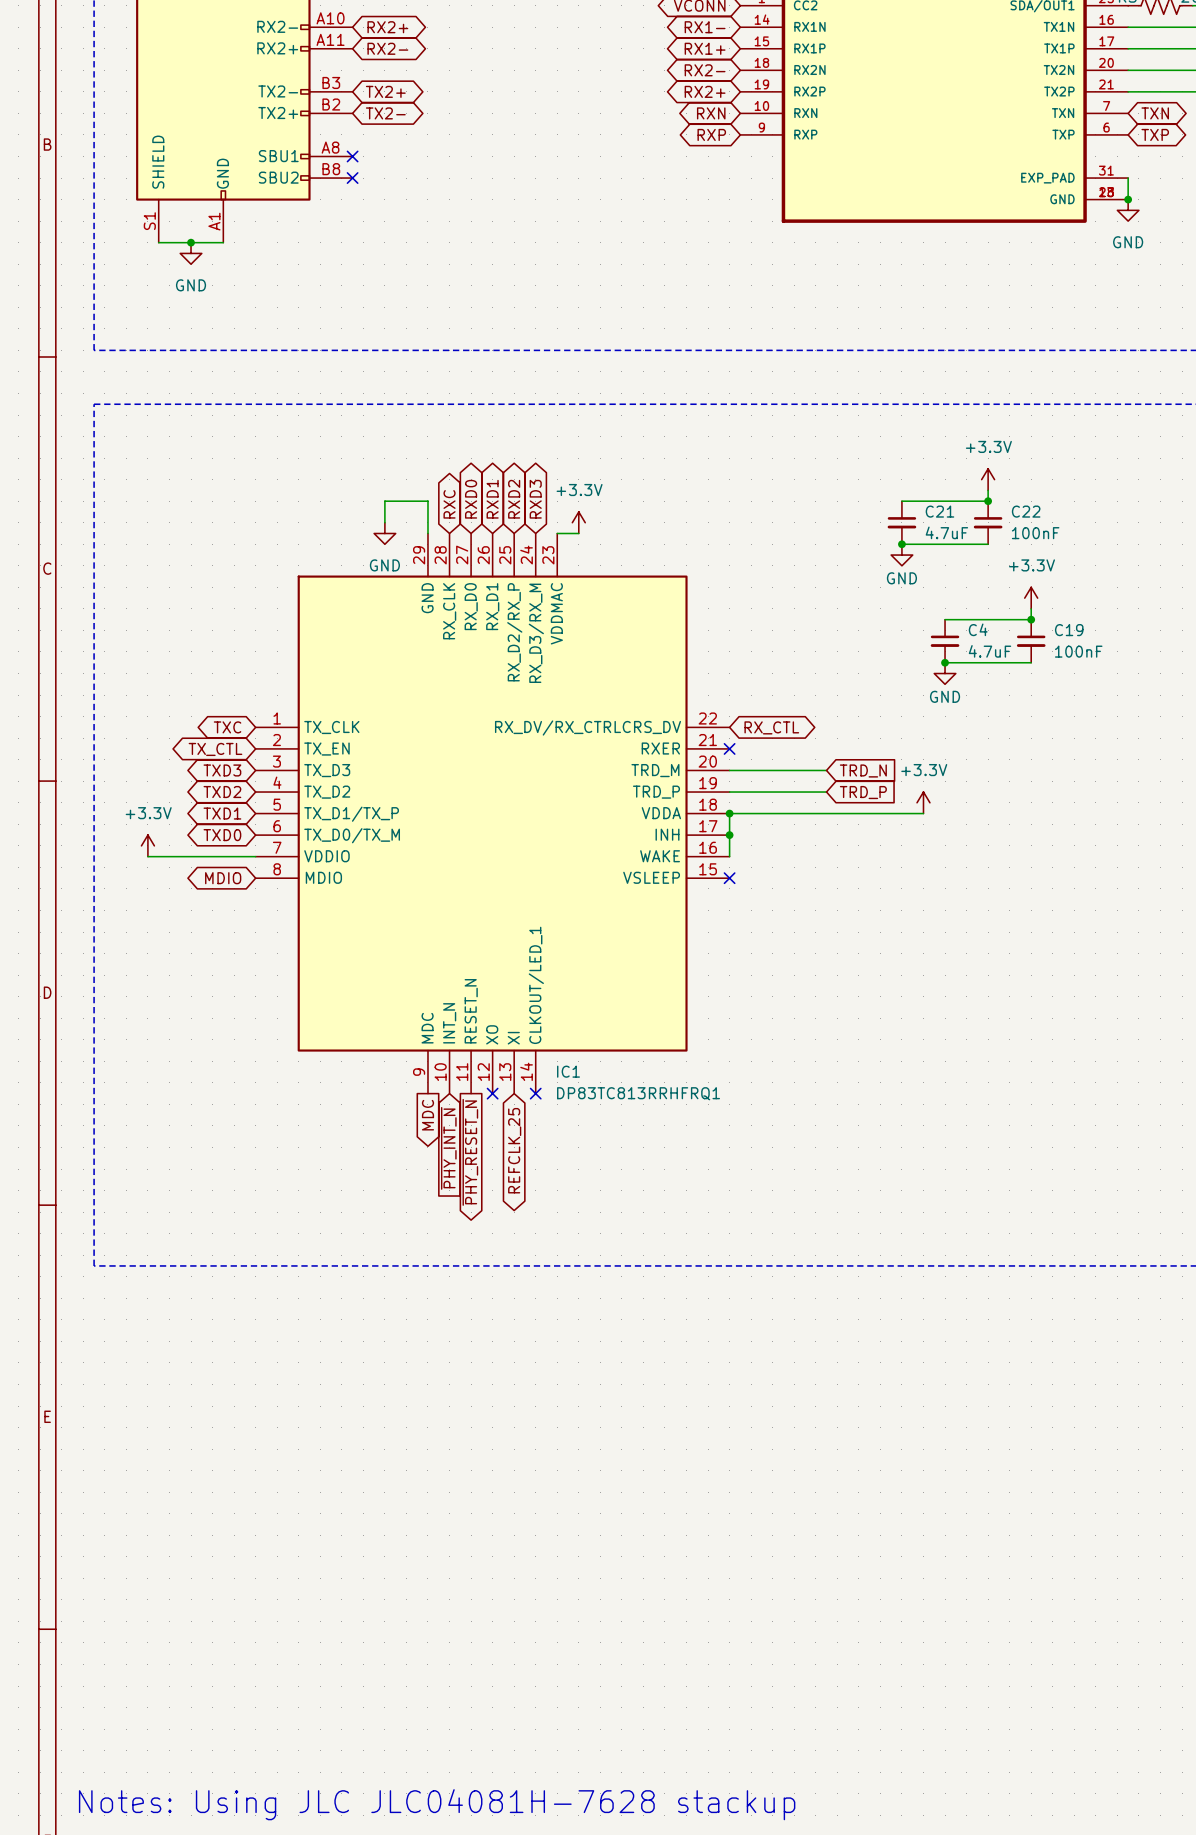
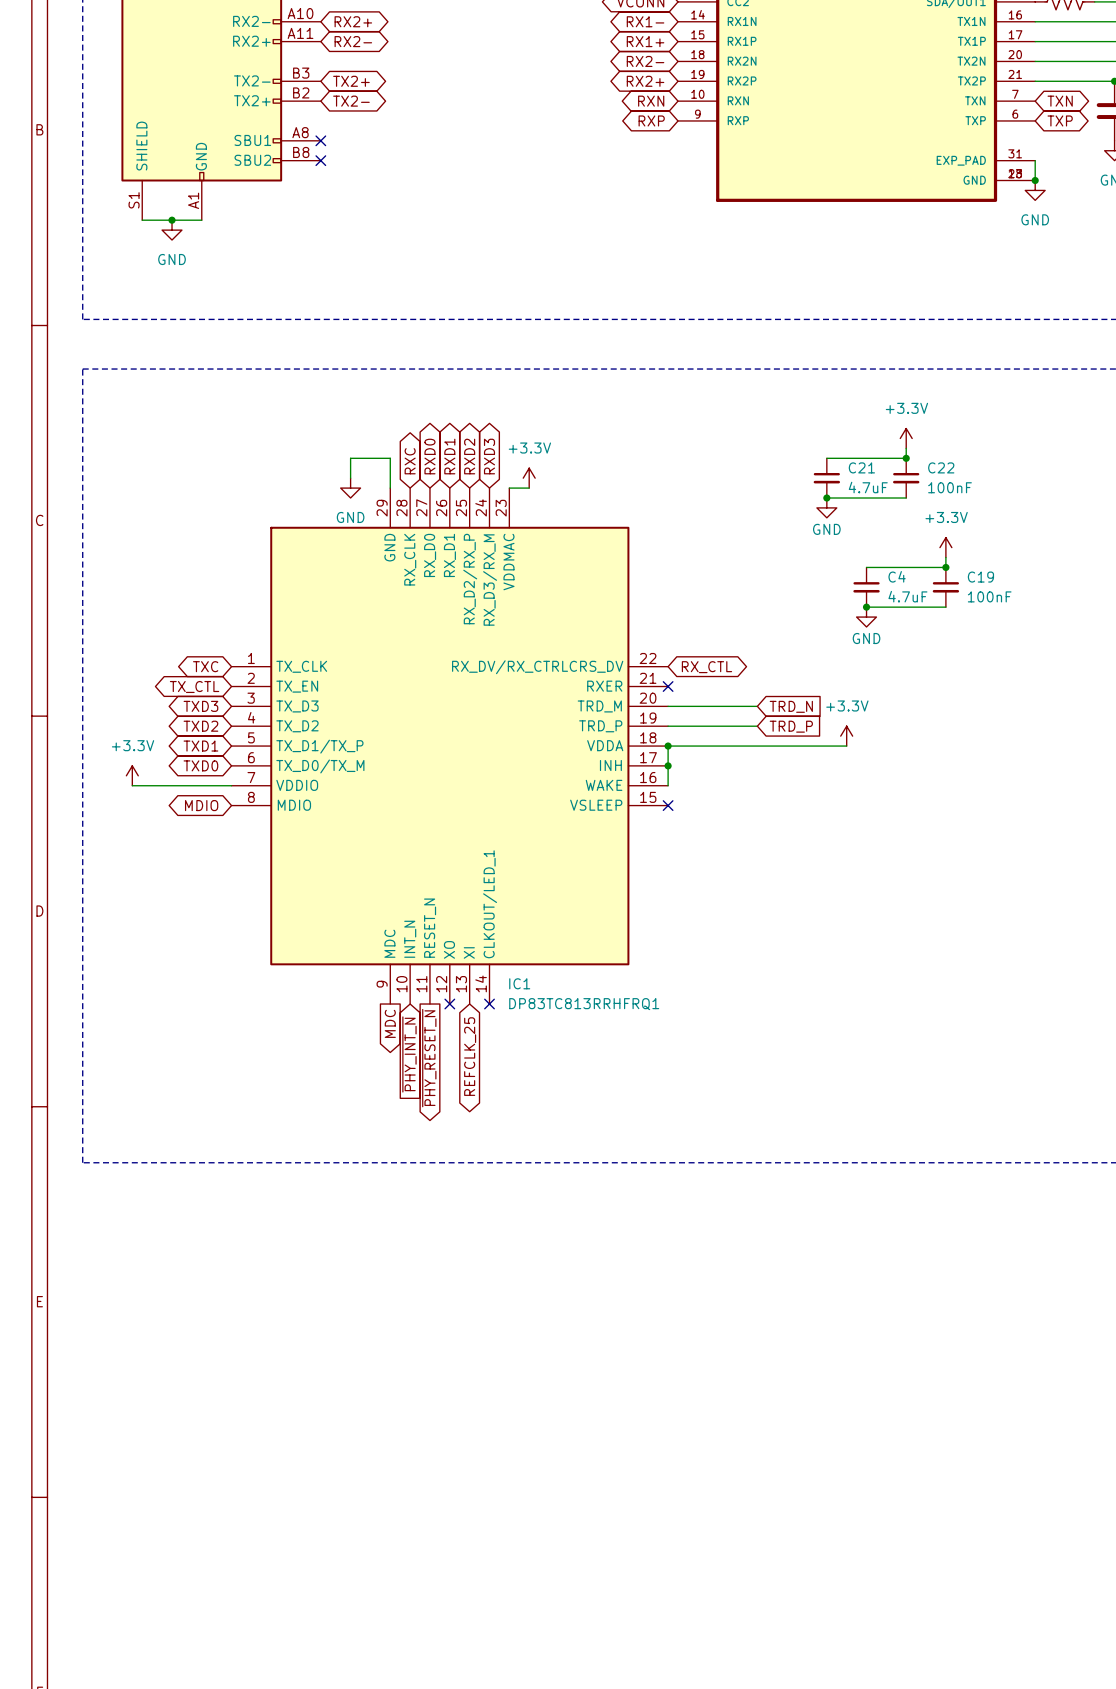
text: Notes: Using JLC JLC04081H-7628 stackup (437, 1804) -> none

